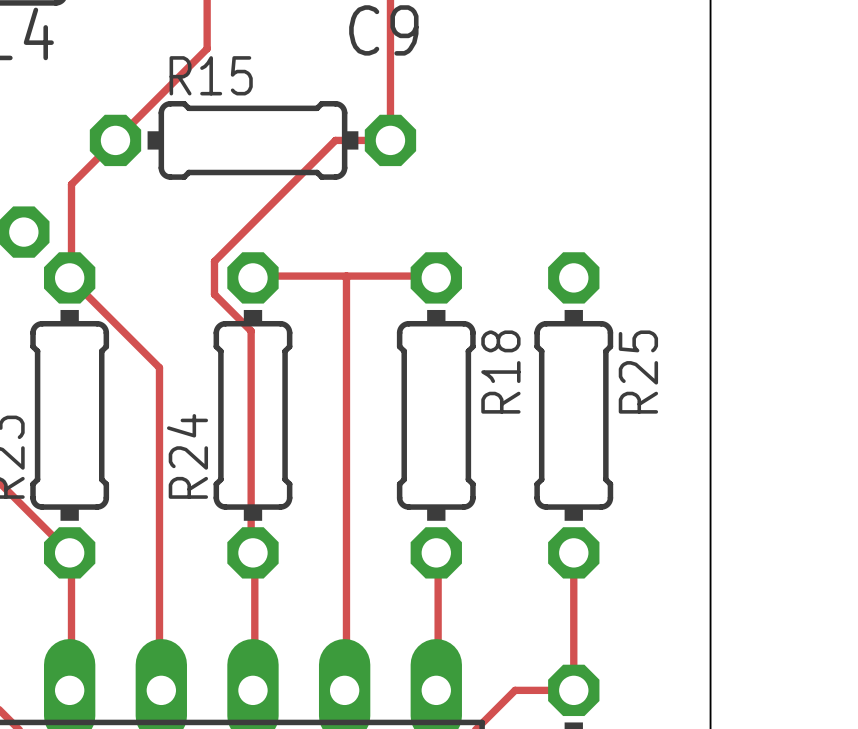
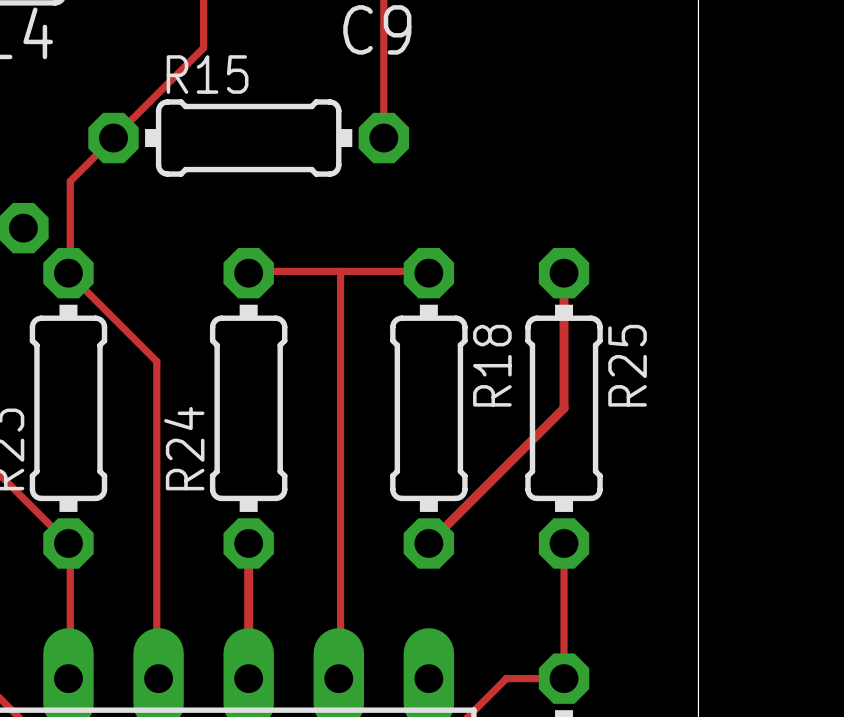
track: (390, 140) (335, 140) (214, 261) (214, 294) (251, 331) (251, 551) (254, 554) (254, 690) (252, 690) -> (248, 543) (248, 678)
track: (436, 552) (438, 554) (438, 690) (436, 690) -> (428, 543) (564, 408) (564, 273)

